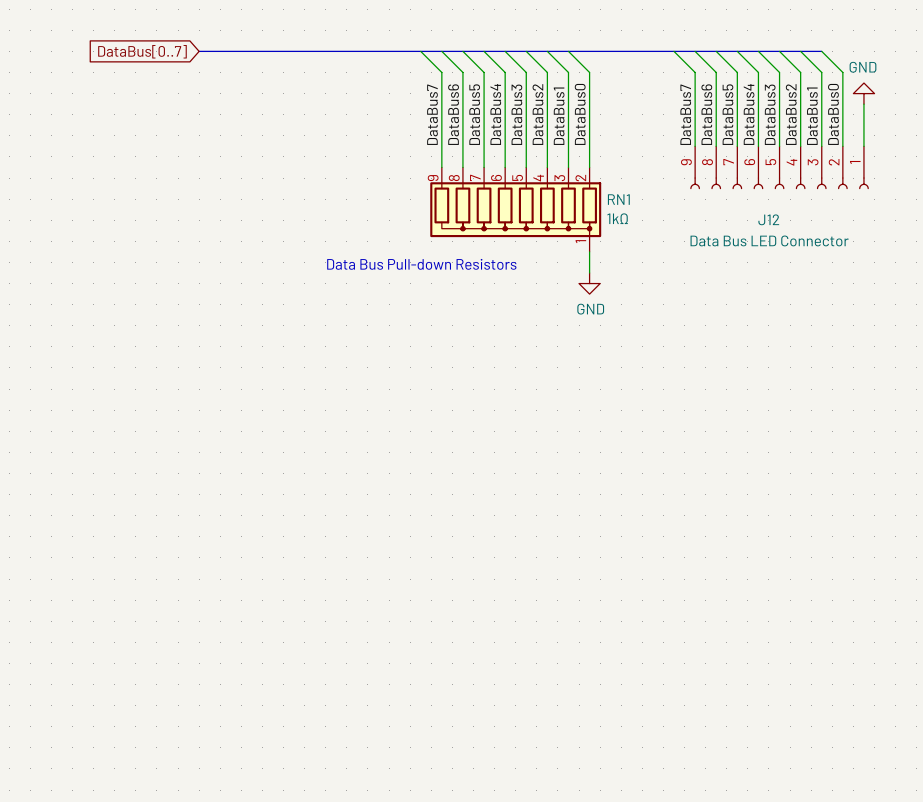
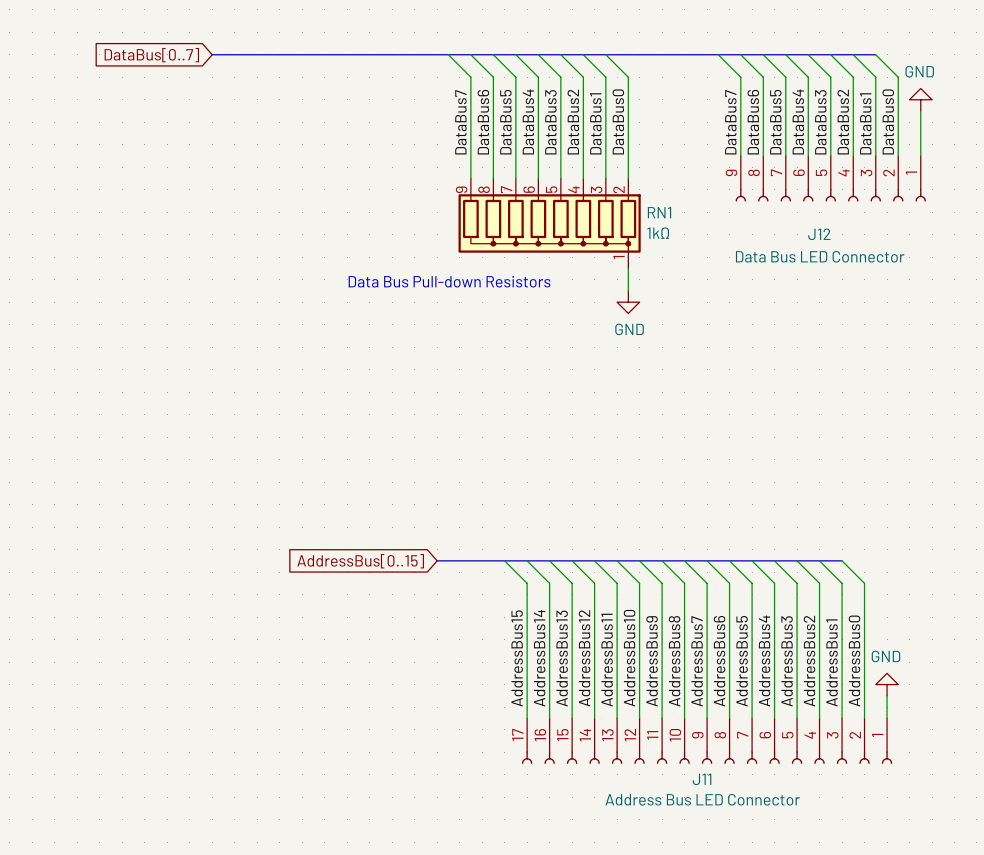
global label: none -> AddressBus[0..15] (360, 561)
bus: none -> (437, 560) (842, 560)
wire: none -> (504, 560) (527, 583) (527, 718)
wire: none -> (527, 560) (549, 583) (549, 718)
wire: none -> (549, 560) (572, 583) (572, 718)
wire: none -> (572, 560) (594, 583) (594, 718)
wire: none -> (594, 560) (617, 583) (617, 718)
wire: none -> (617, 560) (639, 583) (639, 718)
wire: none -> (639, 560) (662, 583) (662, 718)
wire: none -> (662, 560) (684, 583) (684, 718)
wire: none -> (684, 560) (707, 583) (707, 718)
wire: none -> (707, 560) (729, 583) (729, 718)
wire: none -> (729, 560) (752, 583) (752, 718)
wire: none -> (752, 560) (774, 583) (774, 718)
wire: none -> (774, 560) (797, 583) (797, 718)
wire: none -> (797, 560) (819, 583) (819, 718)
wire: none -> (819, 560) (842, 583) (842, 718)
wire: none -> (842, 560) (864, 583) (864, 718)
label: none -> AddressBus15 (517, 658)
label: none -> AddressBus14 (539, 658)
label: none -> AddressBus13 (562, 658)
label: none -> AddressBus12 (584, 658)
label: none -> AddressBus10 (629, 658)
label: none -> AddressBus11 (607, 660)
label: none -> AddressBus9 (652, 661)
label: none -> AddressBus8 (674, 661)
label: none -> AddressBus7 (697, 661)
label: none -> AddressBus6 (719, 661)
label: none -> AddressBus5 (742, 661)
label: none -> AddressBus4 (764, 661)
label: none -> AddressBus3 (787, 661)
label: none -> AddressBus2 (809, 661)
label: none -> AddressBus0 (854, 661)
label: none -> AddressBus1 (832, 662)
power symbol: none -> GND (887, 684)
wire: none -> (887, 695) (887, 718)
J11: none -> Address Bus LED Connector (707, 741)

